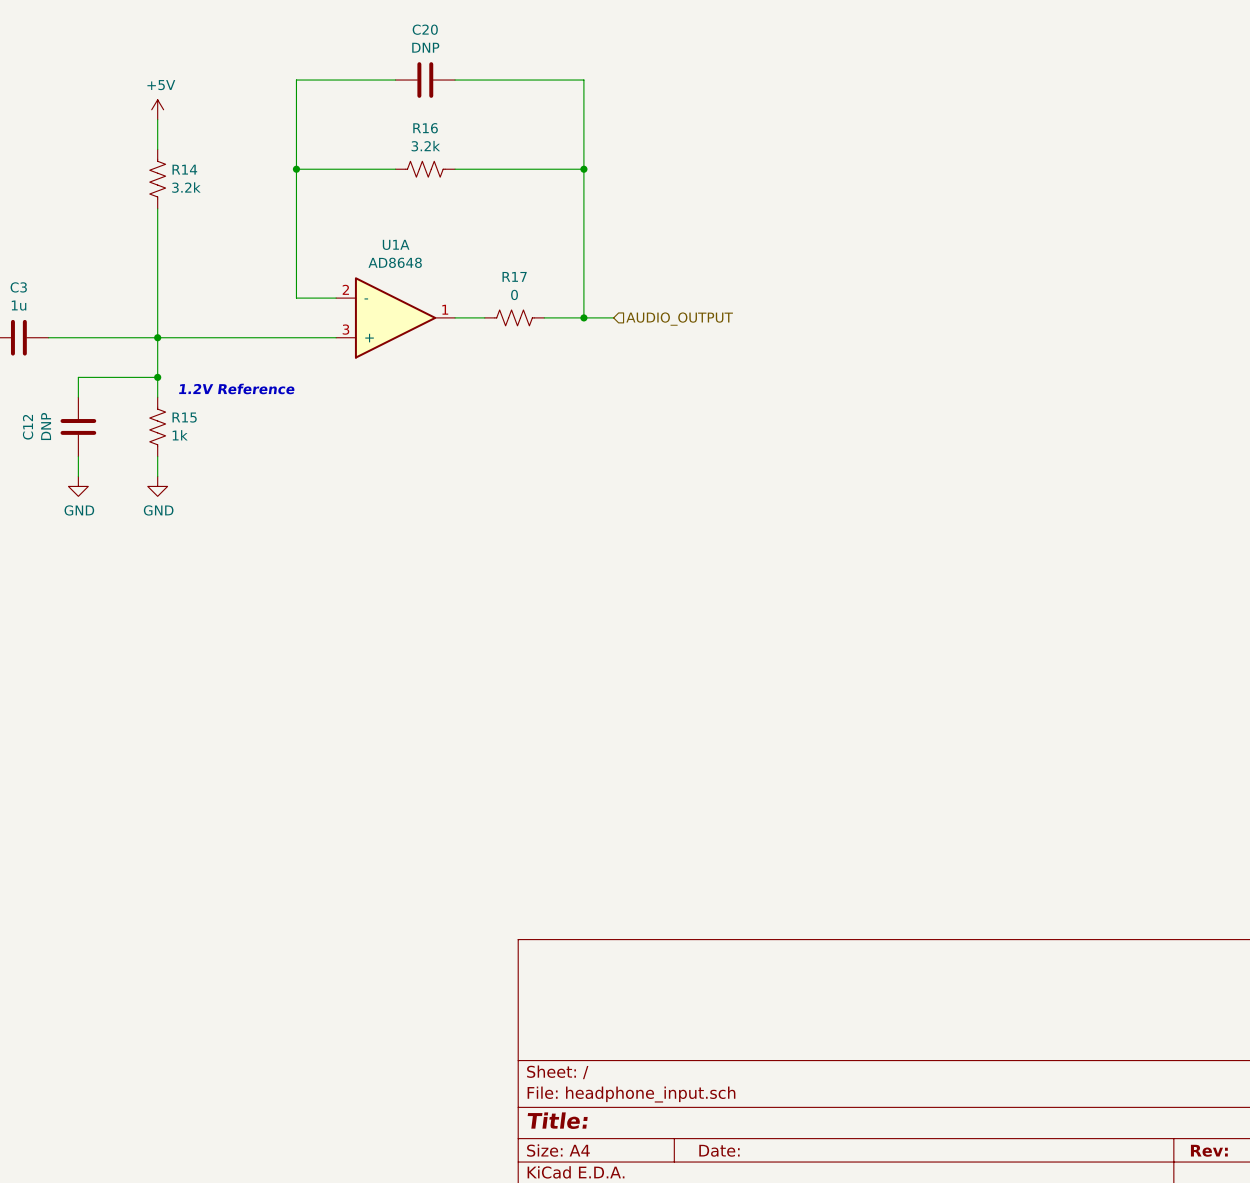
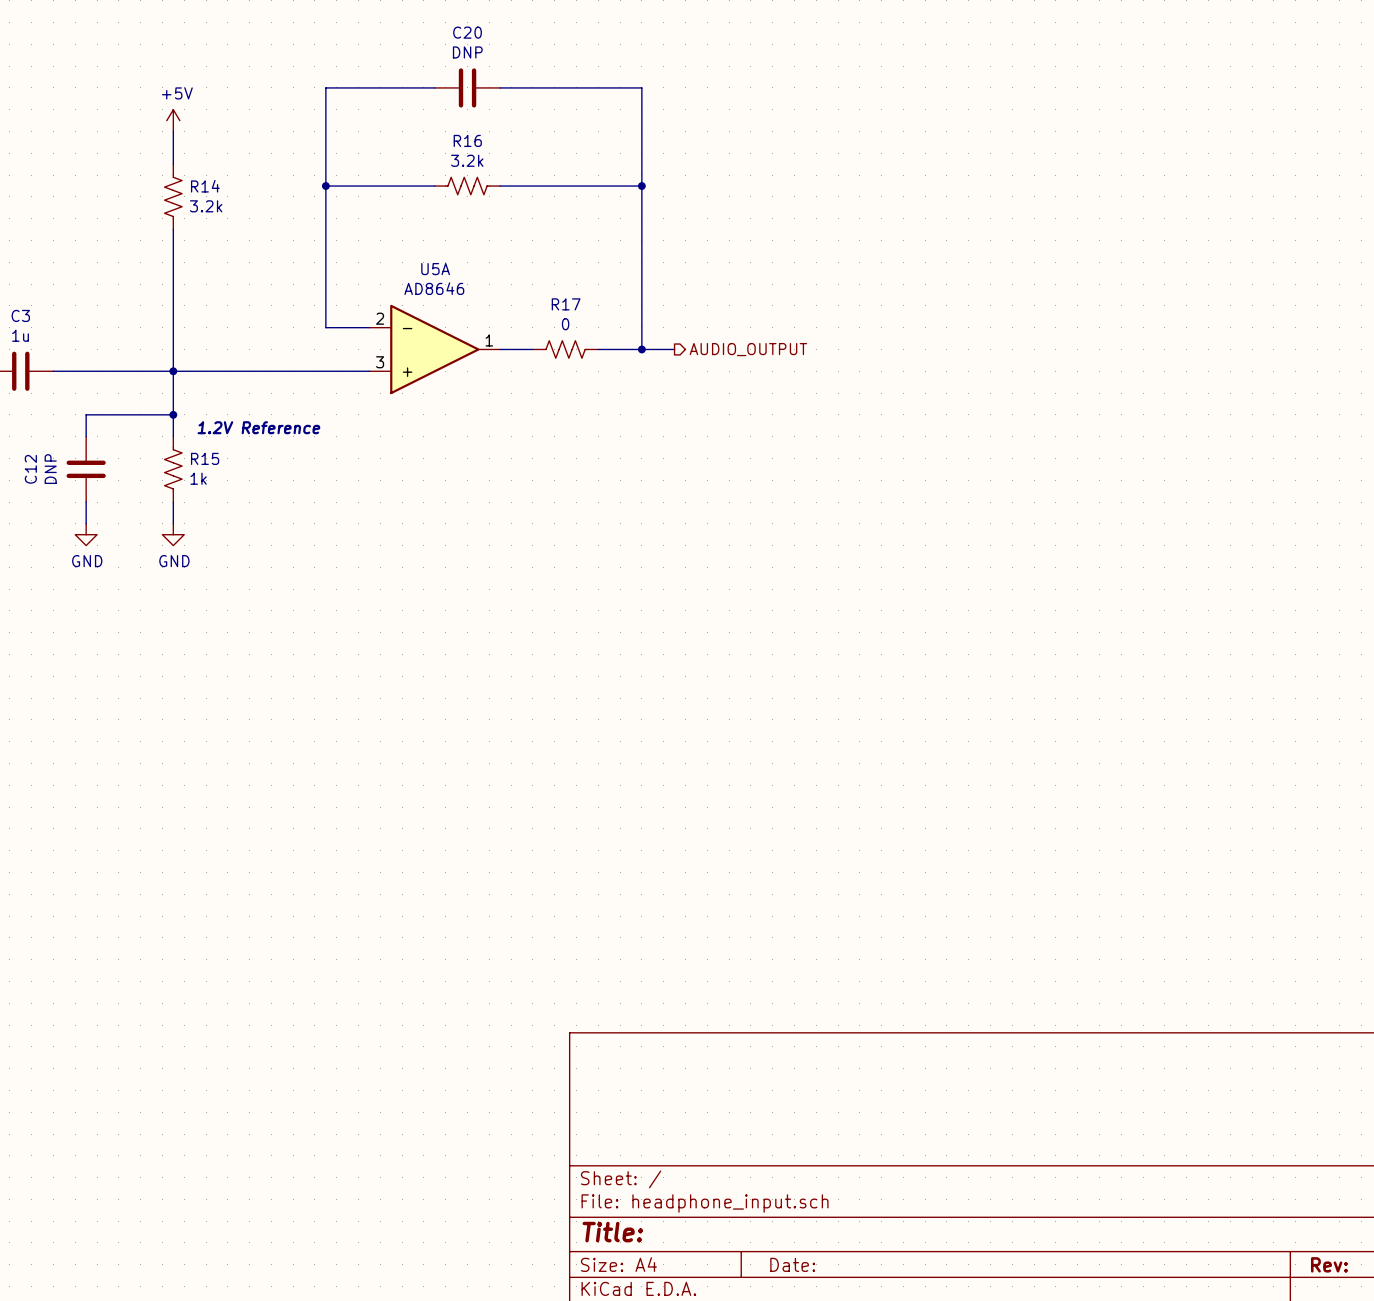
U1A name: U1A (396, 244) -> U5A (435, 269)
U1A value: AD8648 (395, 262) -> AD8646 (434, 288)
hierarchical label shape: input (679, 319) -> output (748, 349)

